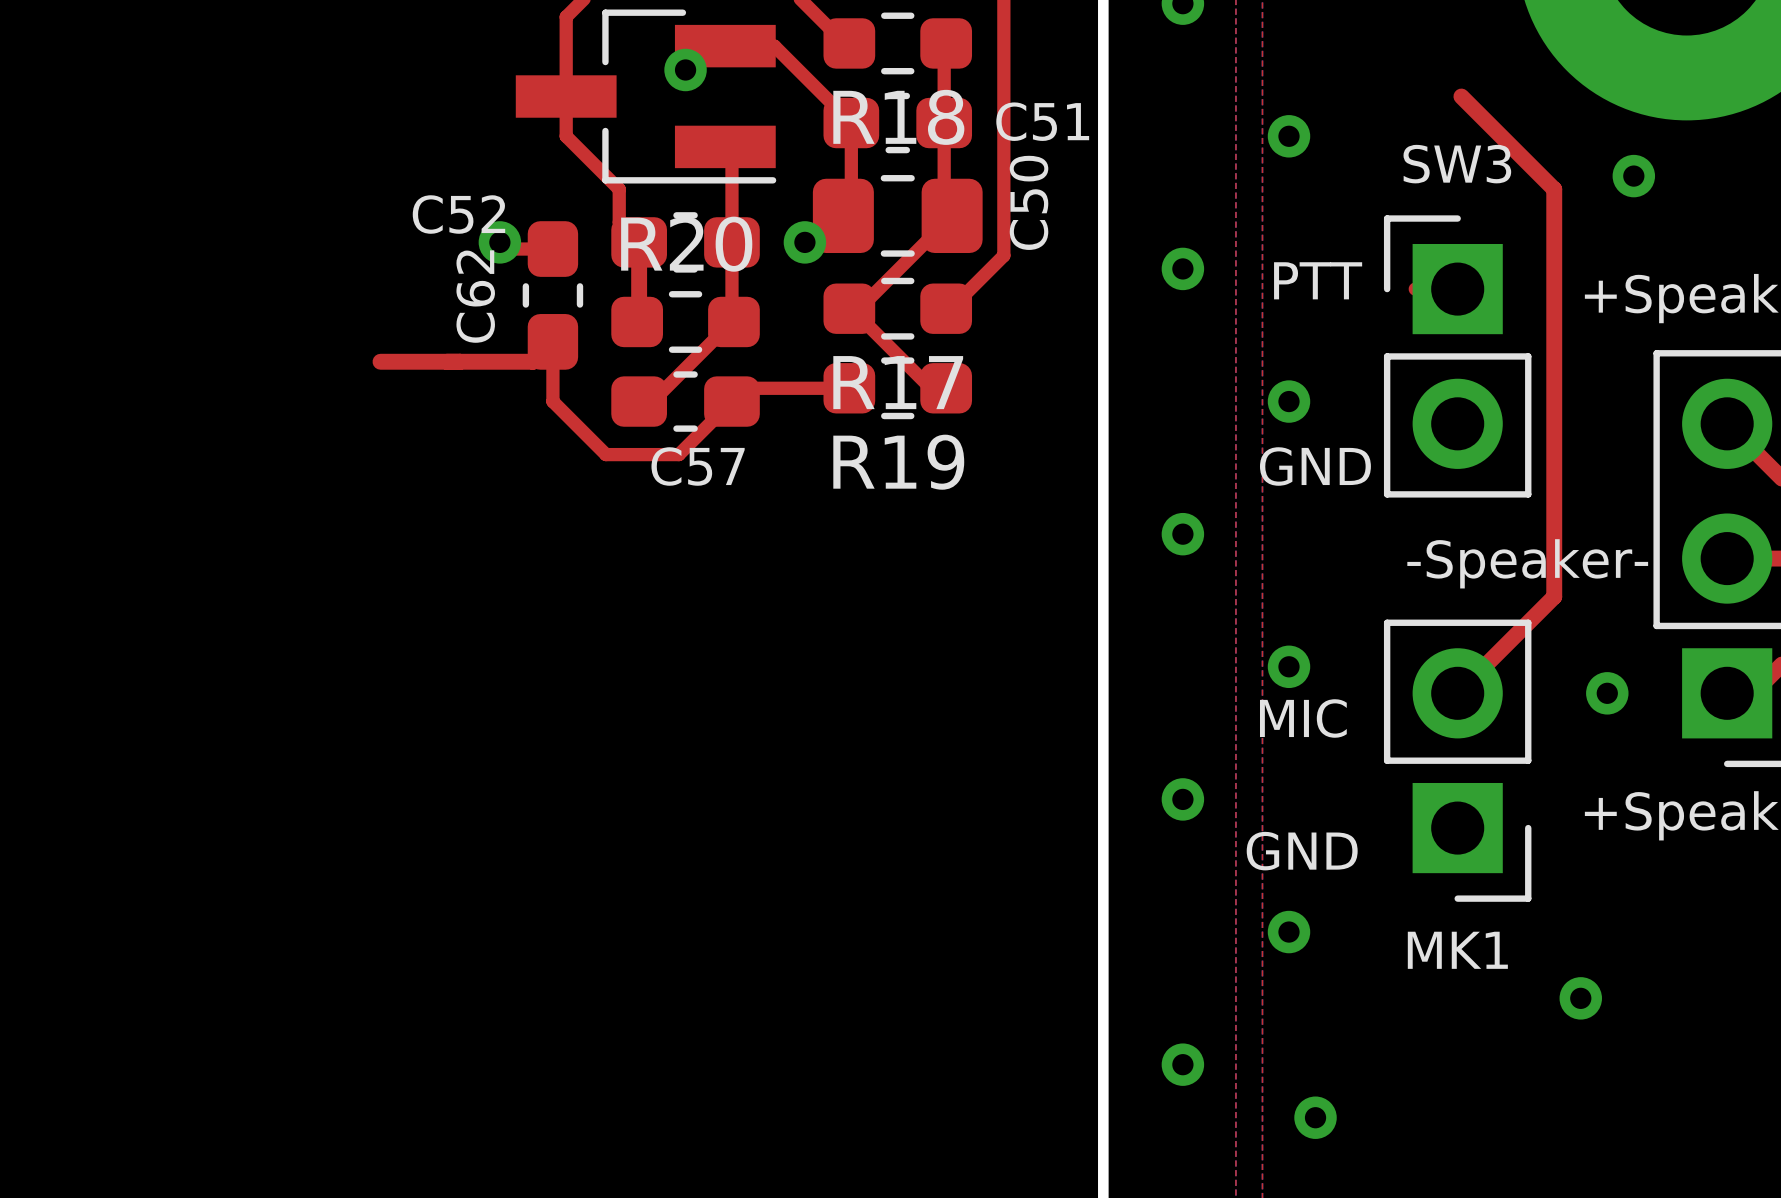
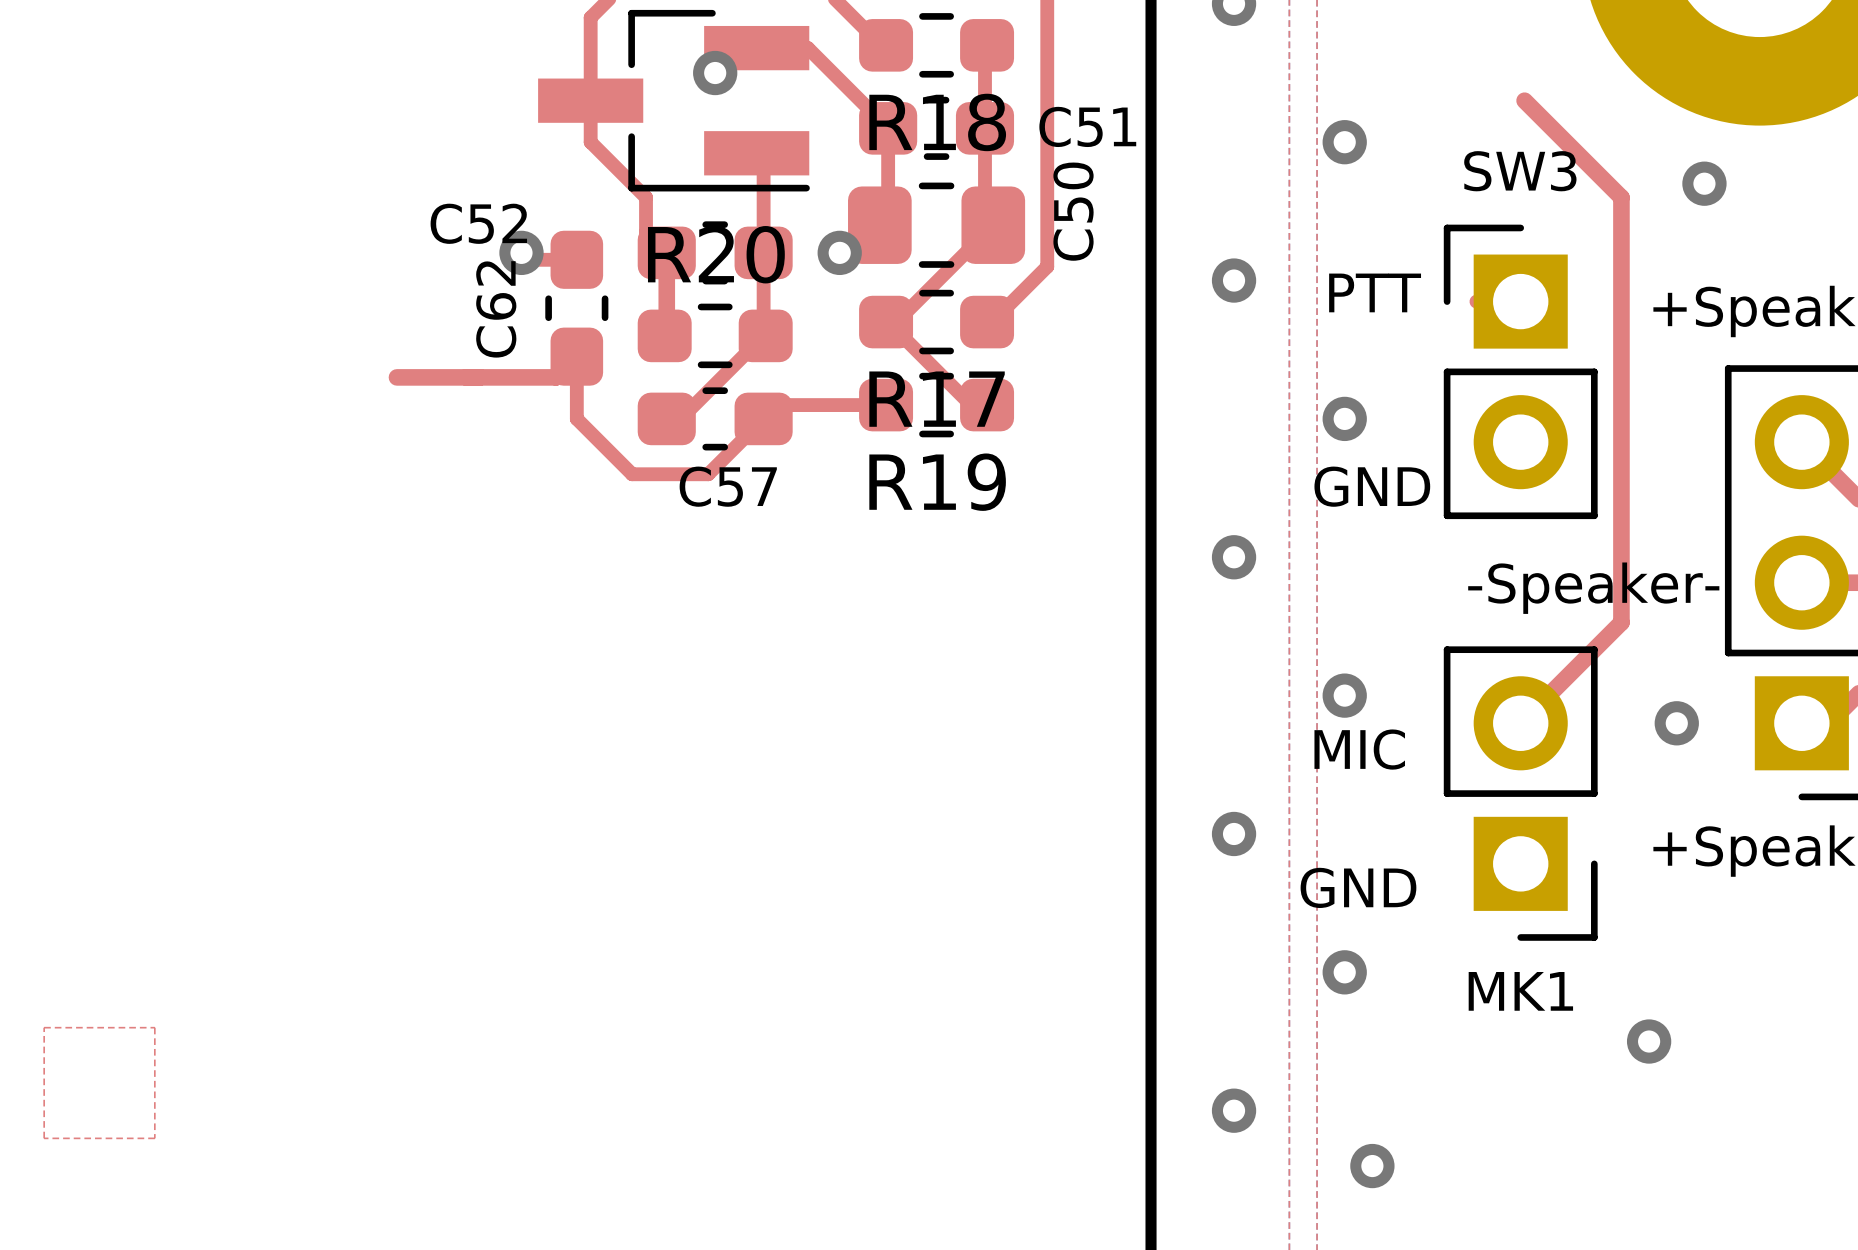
top zone outline: none -> (44, 1027) (154, 1027) (154, 1138) (44, 1138) (44, 1027)

